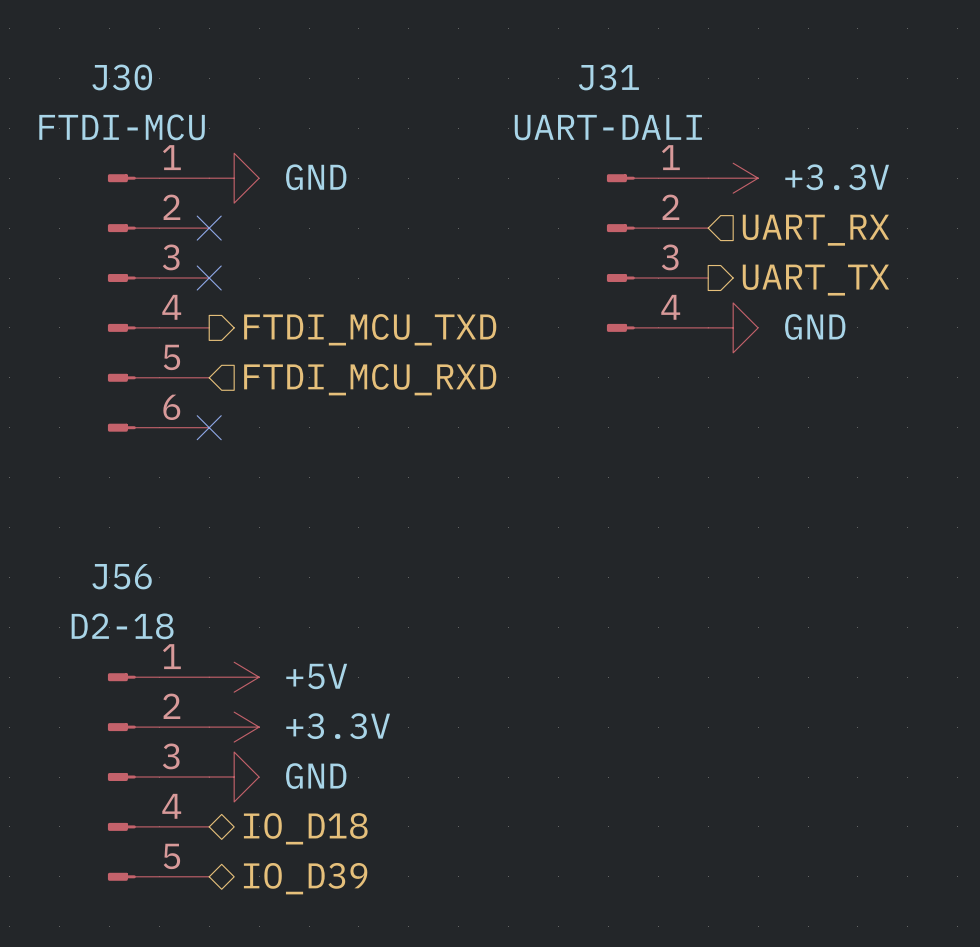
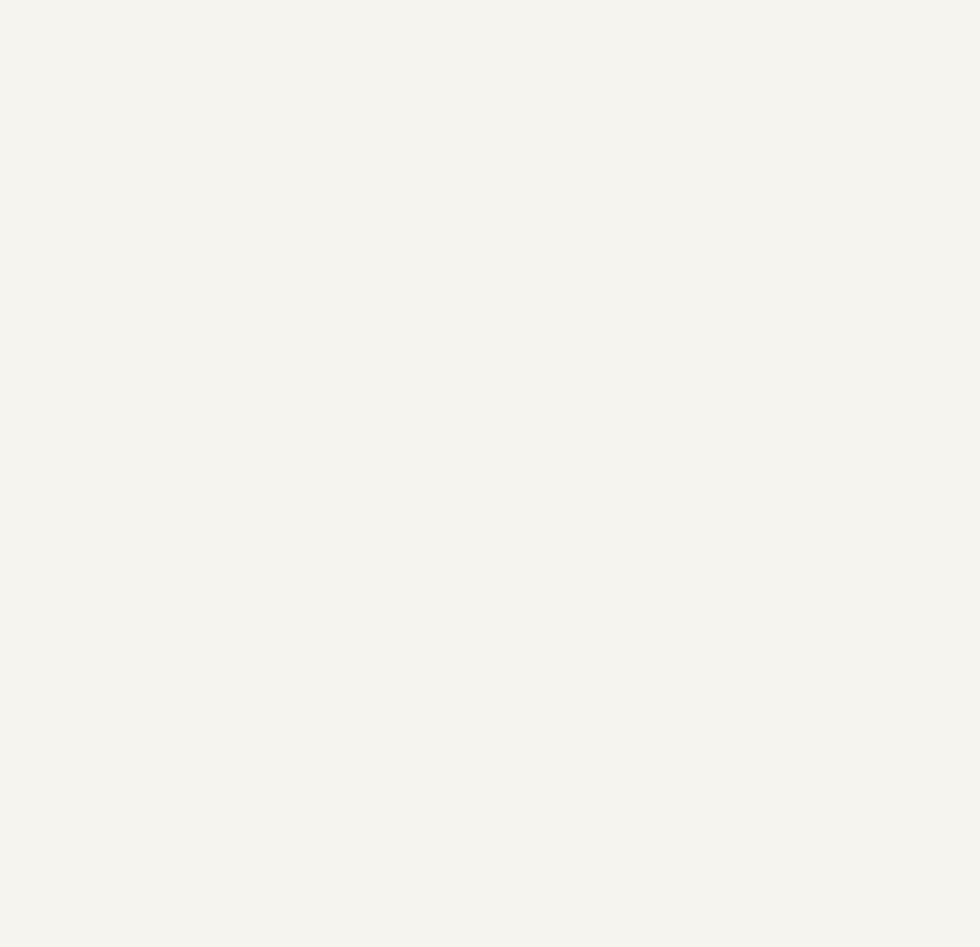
power symbol: GND (234, 178) -> none
power symbol: +3.3V (733, 178) -> none
no-connect mark: (209, 228) -> none
hierarchical label: UART_RX (815, 230) -> none
J31: UART-DALI (657, 253) -> none
no-connect mark: (209, 278) -> none
hierarchical label: UART_TX (815, 280) -> none
J30: FTDI-MCU (158, 302) -> none
power symbol: GND (733, 327) -> none
hierarchical label: FTDI_MCU_TXD (370, 329) -> none
hierarchical label: FTDI_MCU_RXD (370, 379) -> none
no-connect mark: (209, 427) -> none
power symbol: +5V (234, 677) -> none
power symbol: +3.3V (234, 727) -> none
J56: D2-18 (158, 777) -> none
power symbol: GND (234, 777) -> none
hierarchical label: IO_D18 (305, 828) -> none
hierarchical label: IO_D39 (305, 878) -> none

